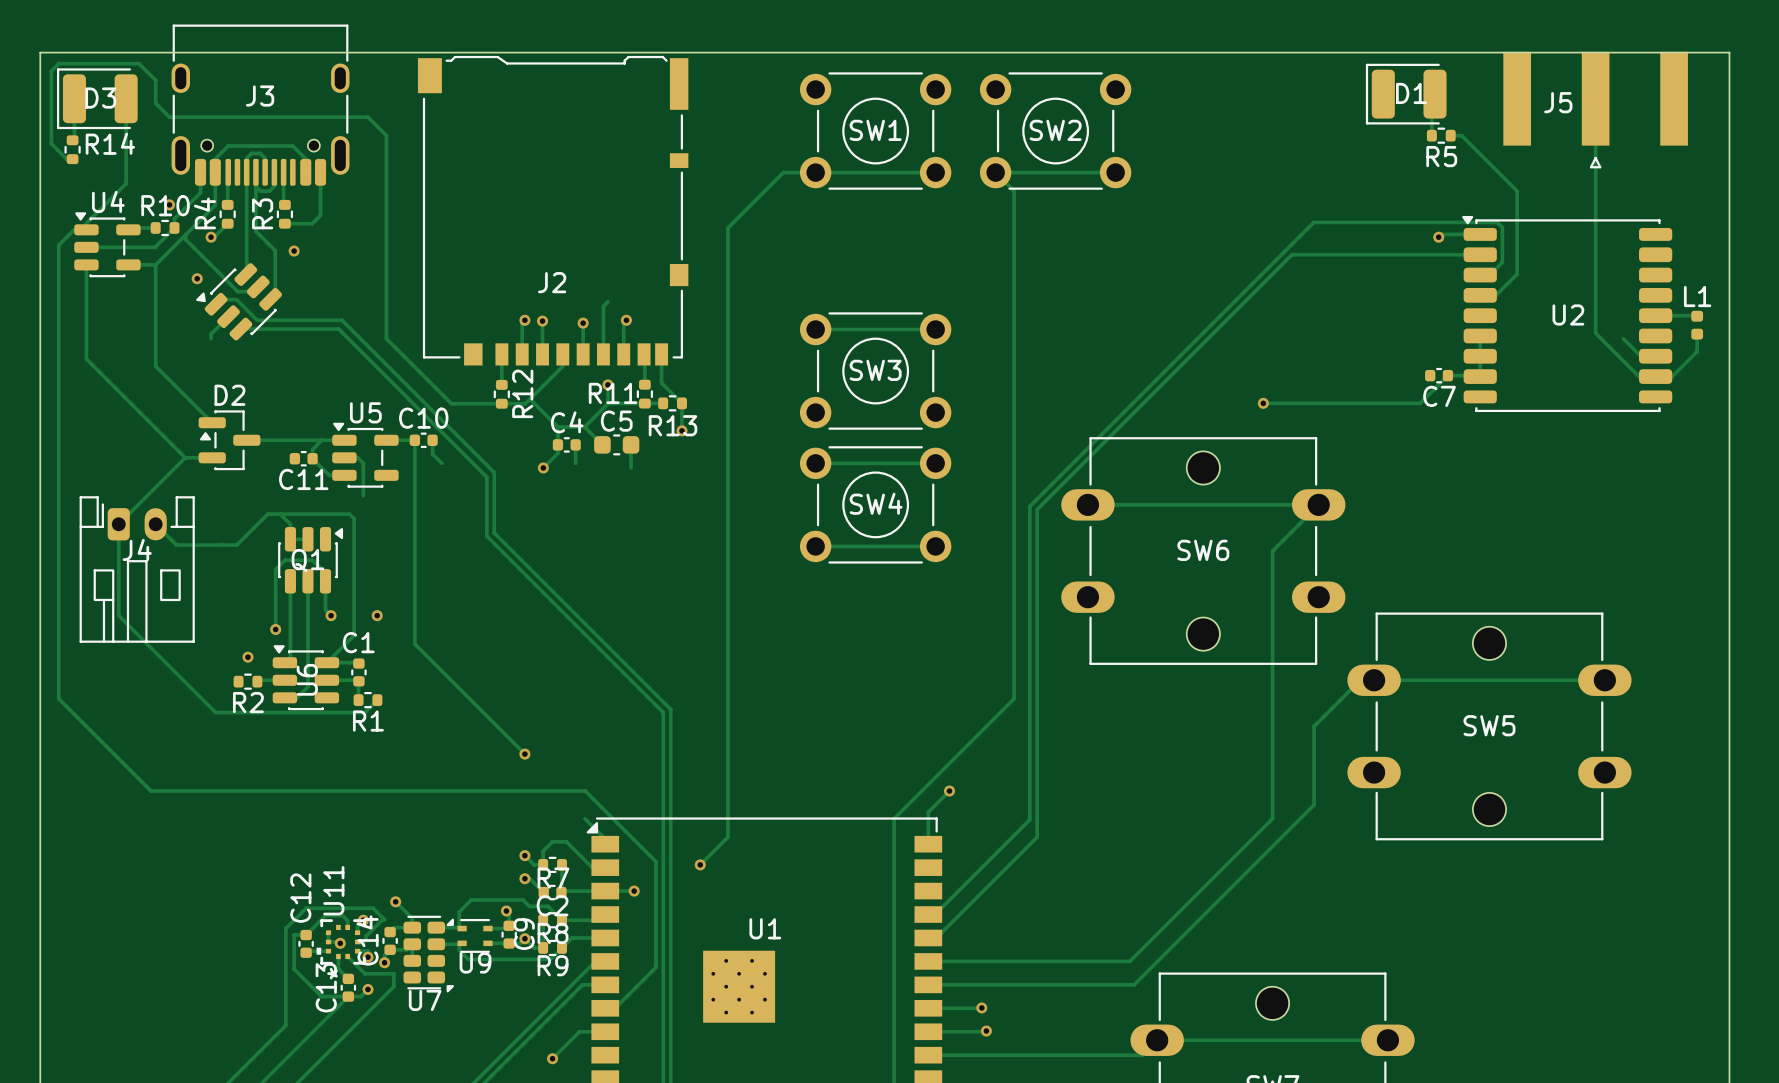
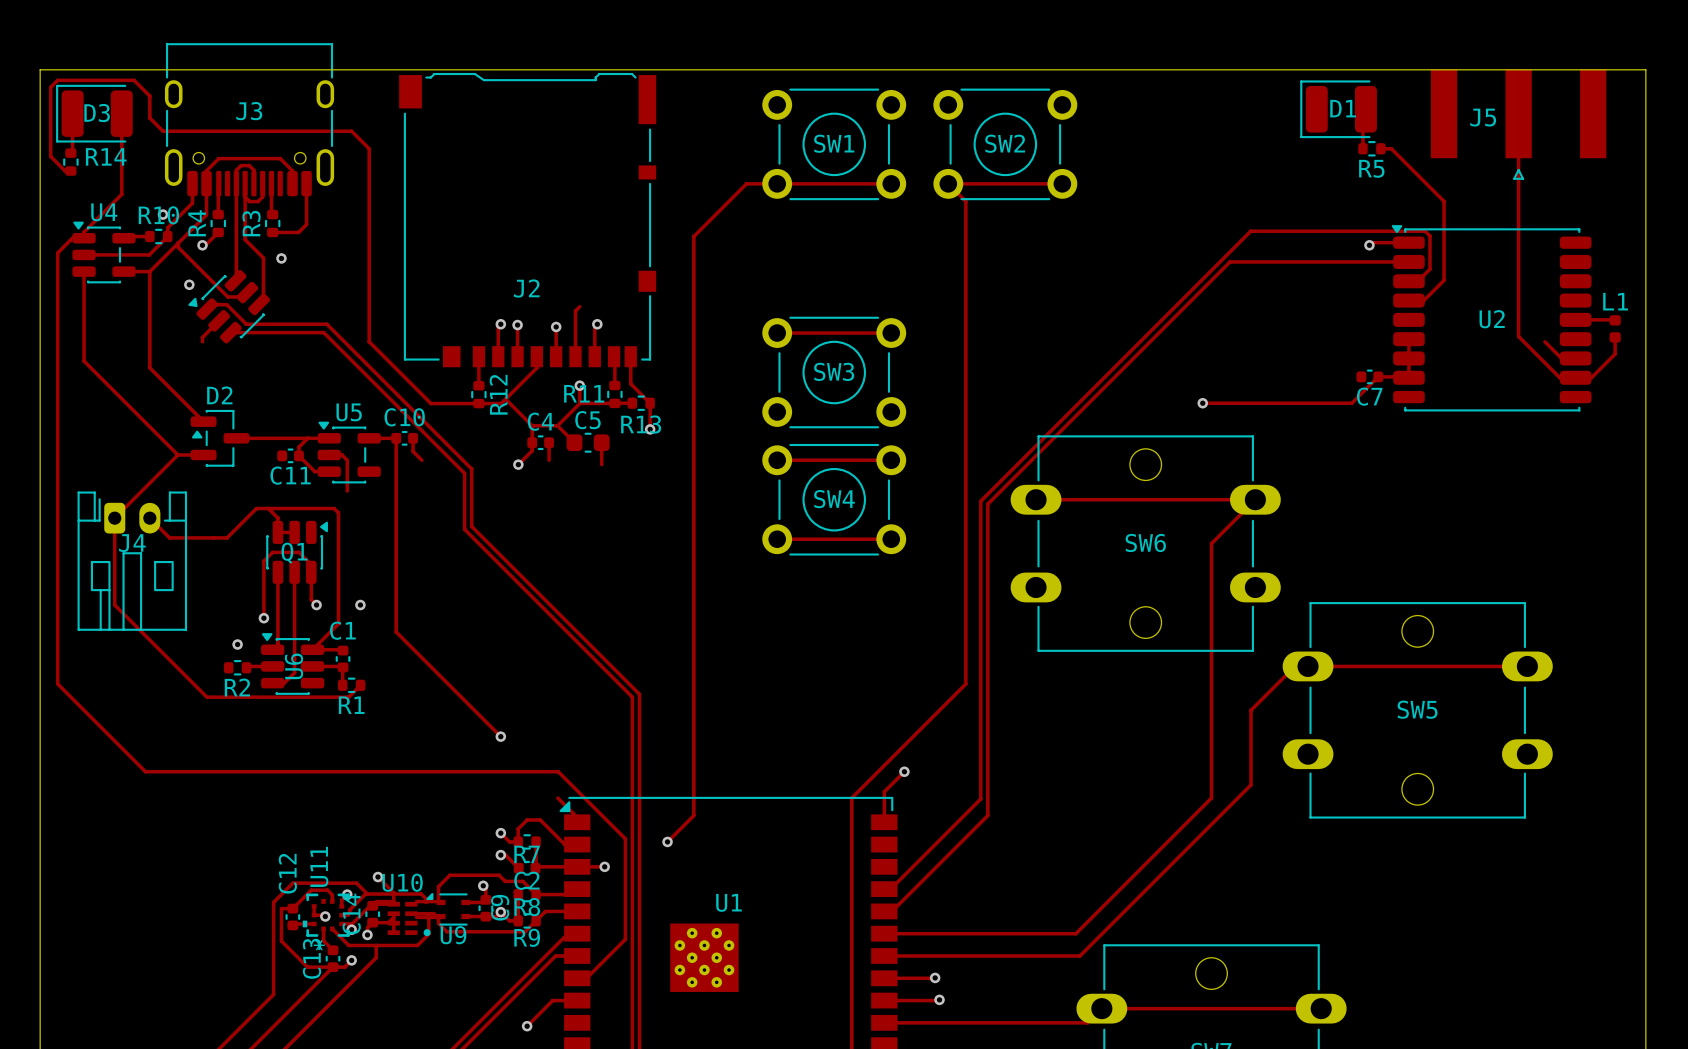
track: none -> (367, 894) (421, 894) (426, 898) (426, 902)
track: none -> (393, 904) (371, 904) (352, 923)
track: none -> (411, 913) (433, 913) (440, 916)
track: none -> (428, 913) (428, 934) (417, 945) (376, 945)
U10: none -> (409, 919)
U7: (428, 954) -> none

